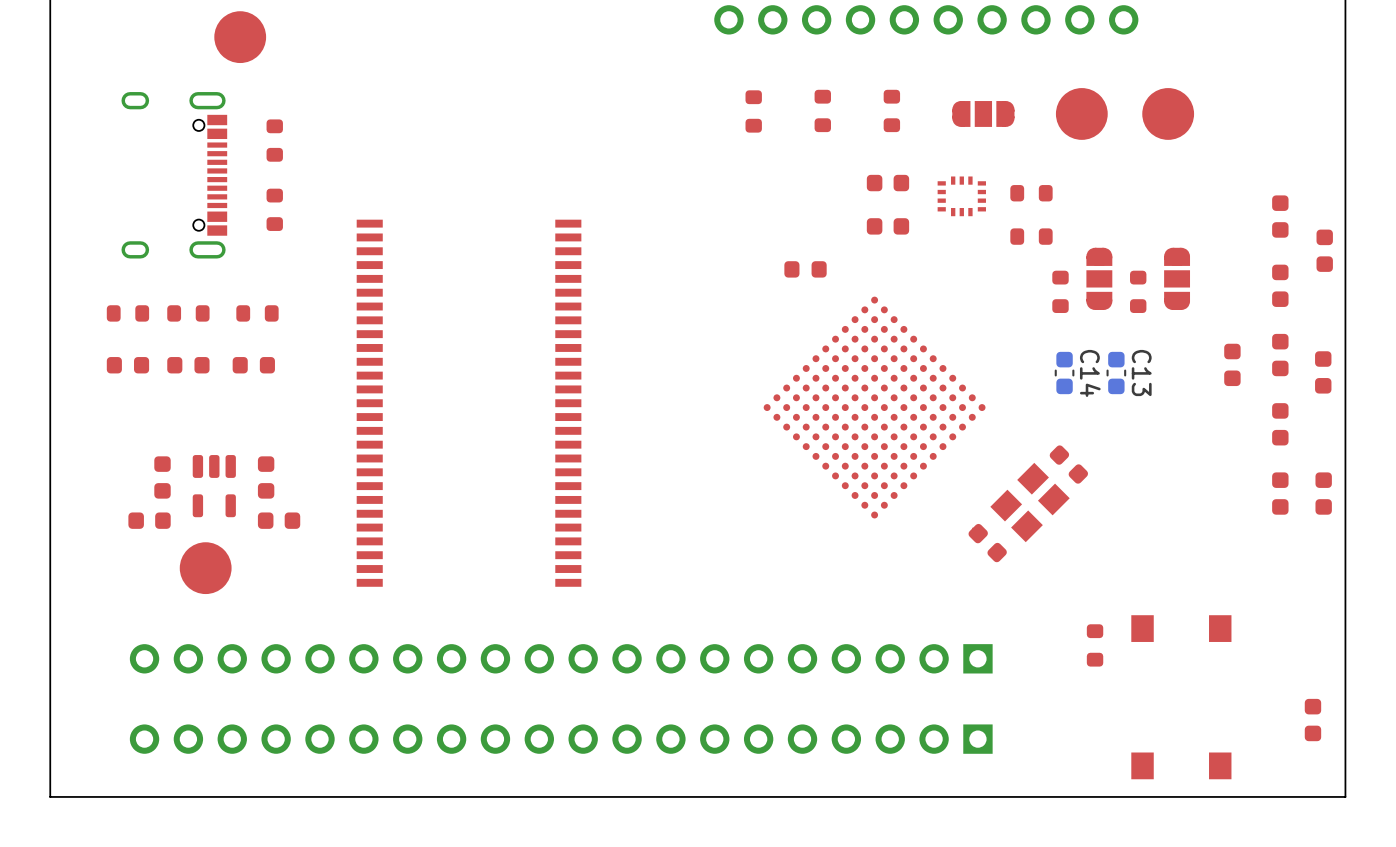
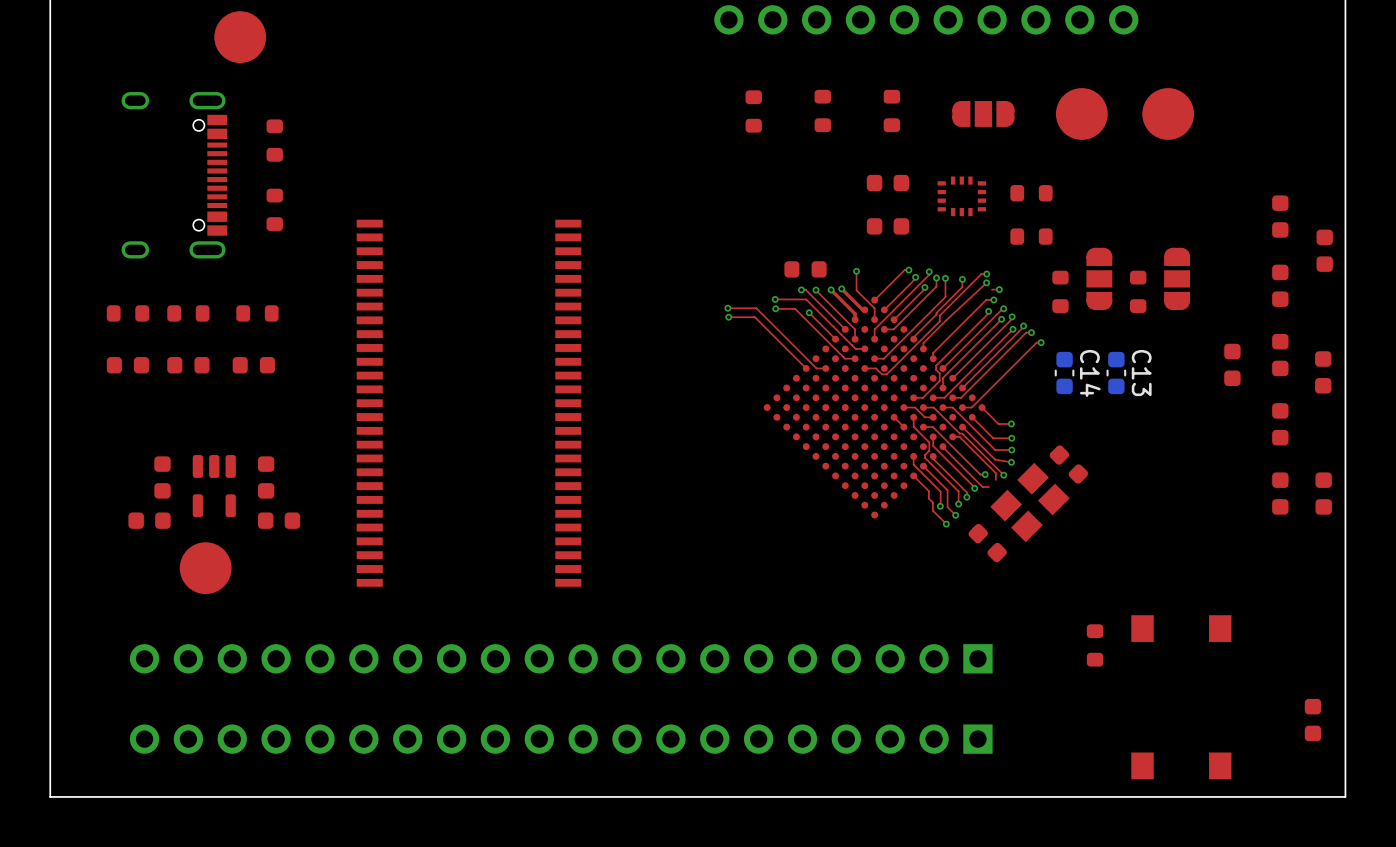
top track: none -> (908, 270) (904, 270) (874, 300)
via: none -> (908, 270)
top track: none -> (856, 271) (856, 290) (874, 308) (874, 319)
via: none -> (856, 271)
top track: none -> (929, 271) (929, 274) (874, 329) (874, 339)
via: none -> (929, 271)
top track: none -> (986, 274) (981, 274) (939, 315) (939, 321) (886, 374) (881, 374) (876, 368) (864, 368)
via: none -> (986, 274)
top track: none -> (915, 277) (884, 309)
via: none -> (915, 277)
top track: none -> (936, 278) (936, 286) (893, 329) (884, 329)
via: none -> (936, 278)
top track: none -> (945, 278) (945, 297) (883, 358) (874, 358)
via: none -> (945, 278)
top track: none -> (962, 279) (962, 287) (913, 339)
via: none -> (962, 279)
top track: none -> (986, 282) (923, 343) (923, 348)
via: none -> (986, 282)
top track: none -> (924, 287) (894, 319)
via: none -> (924, 287)
top track: none -> (841, 288) (864, 309)
via: none -> (841, 288)
top track: none -> (801, 289) (805, 289) (845, 329)
via: none -> (801, 289)
top track: none -> (831, 289) (855, 313) (855, 319)
via: none -> (831, 289)
top track: none -> (999, 289) (991, 289)
via: none -> (999, 289)
top track: none -> (815, 290) (855, 329)
via: none -> (815, 290)
top track: none -> (774, 299) (806, 299) (852, 345)
via: none -> (775, 299)
top track: none -> (993, 299) (986, 299) (933, 352) (933, 358)
via: none -> (993, 299)
top track: none -> (727, 308) (756, 308) (816, 368) (825, 368)
via: none -> (727, 308)
top track: none -> (775, 308) (795, 308) (845, 358) (855, 358)
via: none -> (775, 308)
top track: none -> (1003, 308) (942, 368)
via: none -> (1003, 308)
top track: none -> (988, 311) (936, 365) (936, 369) (939, 373) (939, 381) (922, 397) (913, 397)
via: none -> (988, 311)
top track: none -> (809, 312) (835, 339)
via: none -> (809, 312)
top track: none -> (1012, 316) (952, 378)
via: none -> (1012, 316)
via: none -> (728, 317)
top track: none -> (753, 317) (728, 317)
top track: none -> (754, 317) (806, 368)
top track: none -> (1001, 319) (942, 377) (942, 388)
via: none -> (1001, 319)
top track: none -> (1023, 326) (962, 388)
via: none -> (1023, 326)
top track: none -> (855, 329) (855, 339)
top track: none -> (1012, 329) (944, 397) (933, 397)
via: none -> (1012, 329)
top track: none -> (1031, 332) (1026, 332) (961, 397) (952, 397)
via: none -> (1031, 332)
top track: none -> (1041, 342) (1036, 342) (971, 407) (962, 407)
via: none -> (1041, 342)
top track: none -> (852, 345) (855, 348) (864, 348)
top track: none -> (903, 407) (915, 407) (924, 417) (933, 417)
top track: none -> (923, 407) (933, 407) (1003, 475)
top track: none -> (942, 407) (952, 407) (995, 450) (1011, 450)
top track: none -> (982, 407) (998, 423) (1011, 423)
top track: none -> (894, 417) (903, 427)
top track: none -> (913, 417) (913, 426) (929, 442) (929, 450) (925, 454) (925, 457) (958, 491) (958, 504)
top track: none -> (972, 417) (993, 438) (1011, 438)
via: none -> (1011, 423)
top track: none -> (923, 427) (932, 427) (980, 474) (985, 474)
top track: none -> (962, 427) (995, 459) (1011, 462)
top track: none -> (933, 436) (933, 446) (974, 488)
top track: none -> (952, 436) (959, 436) (995, 473) (995, 479)
via: none -> (1011, 438)
top track: none -> (942, 446) (982, 486) (989, 486)
via: none -> (1011, 450)
top track: none -> (913, 456) (913, 464) (940, 491) (940, 506)
top track: none -> (933, 456) (933, 458) (966, 492) (966, 497)
via: none -> (1011, 462)
top track: none -> (923, 466) (947, 490) (947, 507) (955, 515)
via: none -> (985, 474)
top track: none -> (913, 475) (928, 491) (928, 498) (932, 502) (932, 510) (946, 524)
via: none -> (1003, 475)
via: none -> (974, 488)
via: none -> (966, 497)
via: none -> (958, 504)
via: none -> (940, 506)
via: none -> (955, 515)
via: none -> (946, 524)

